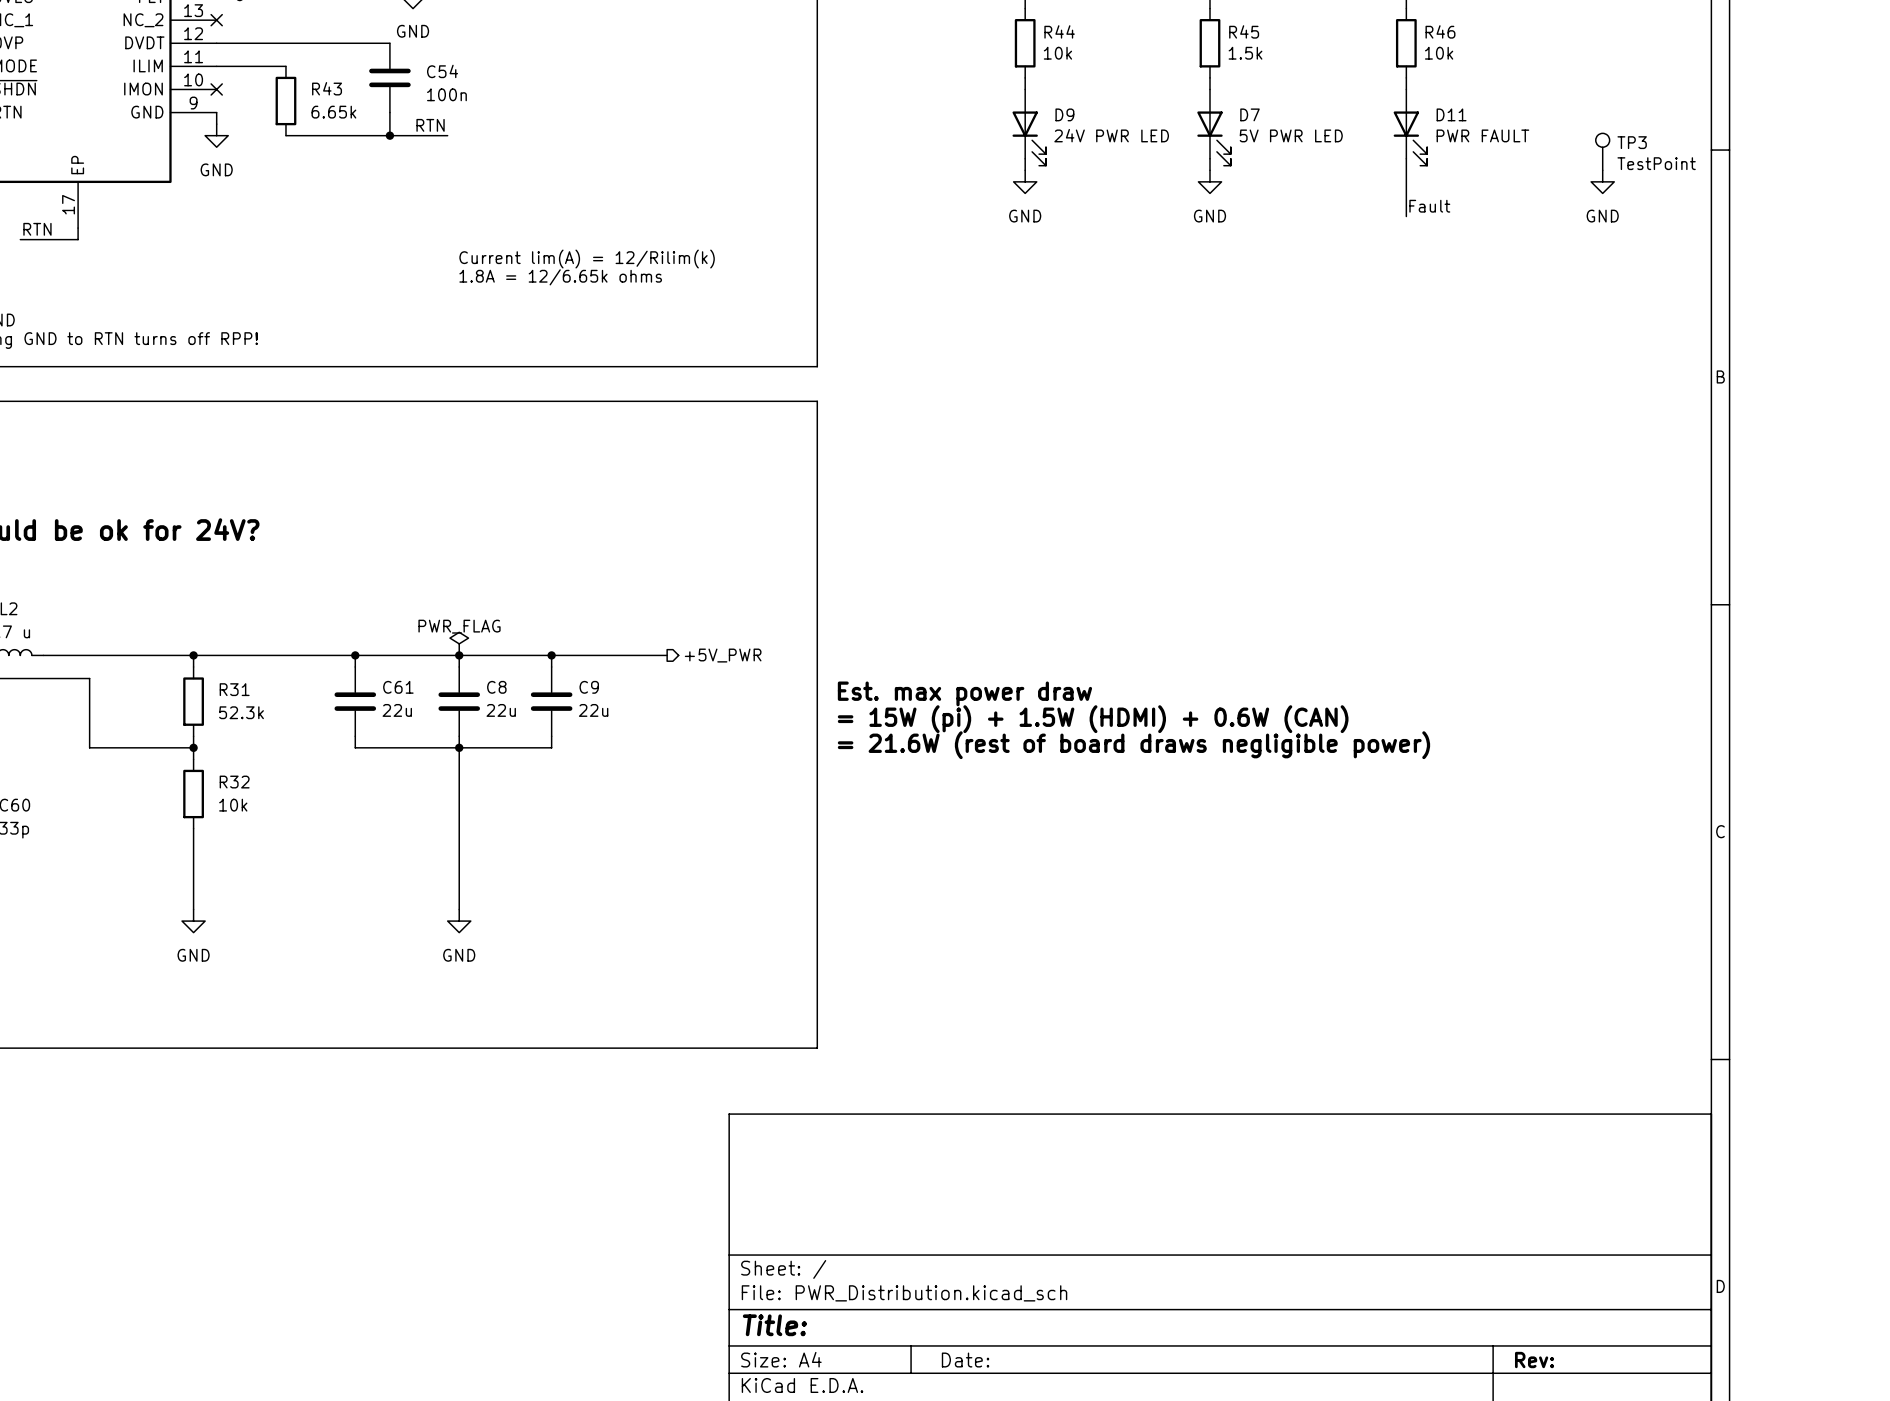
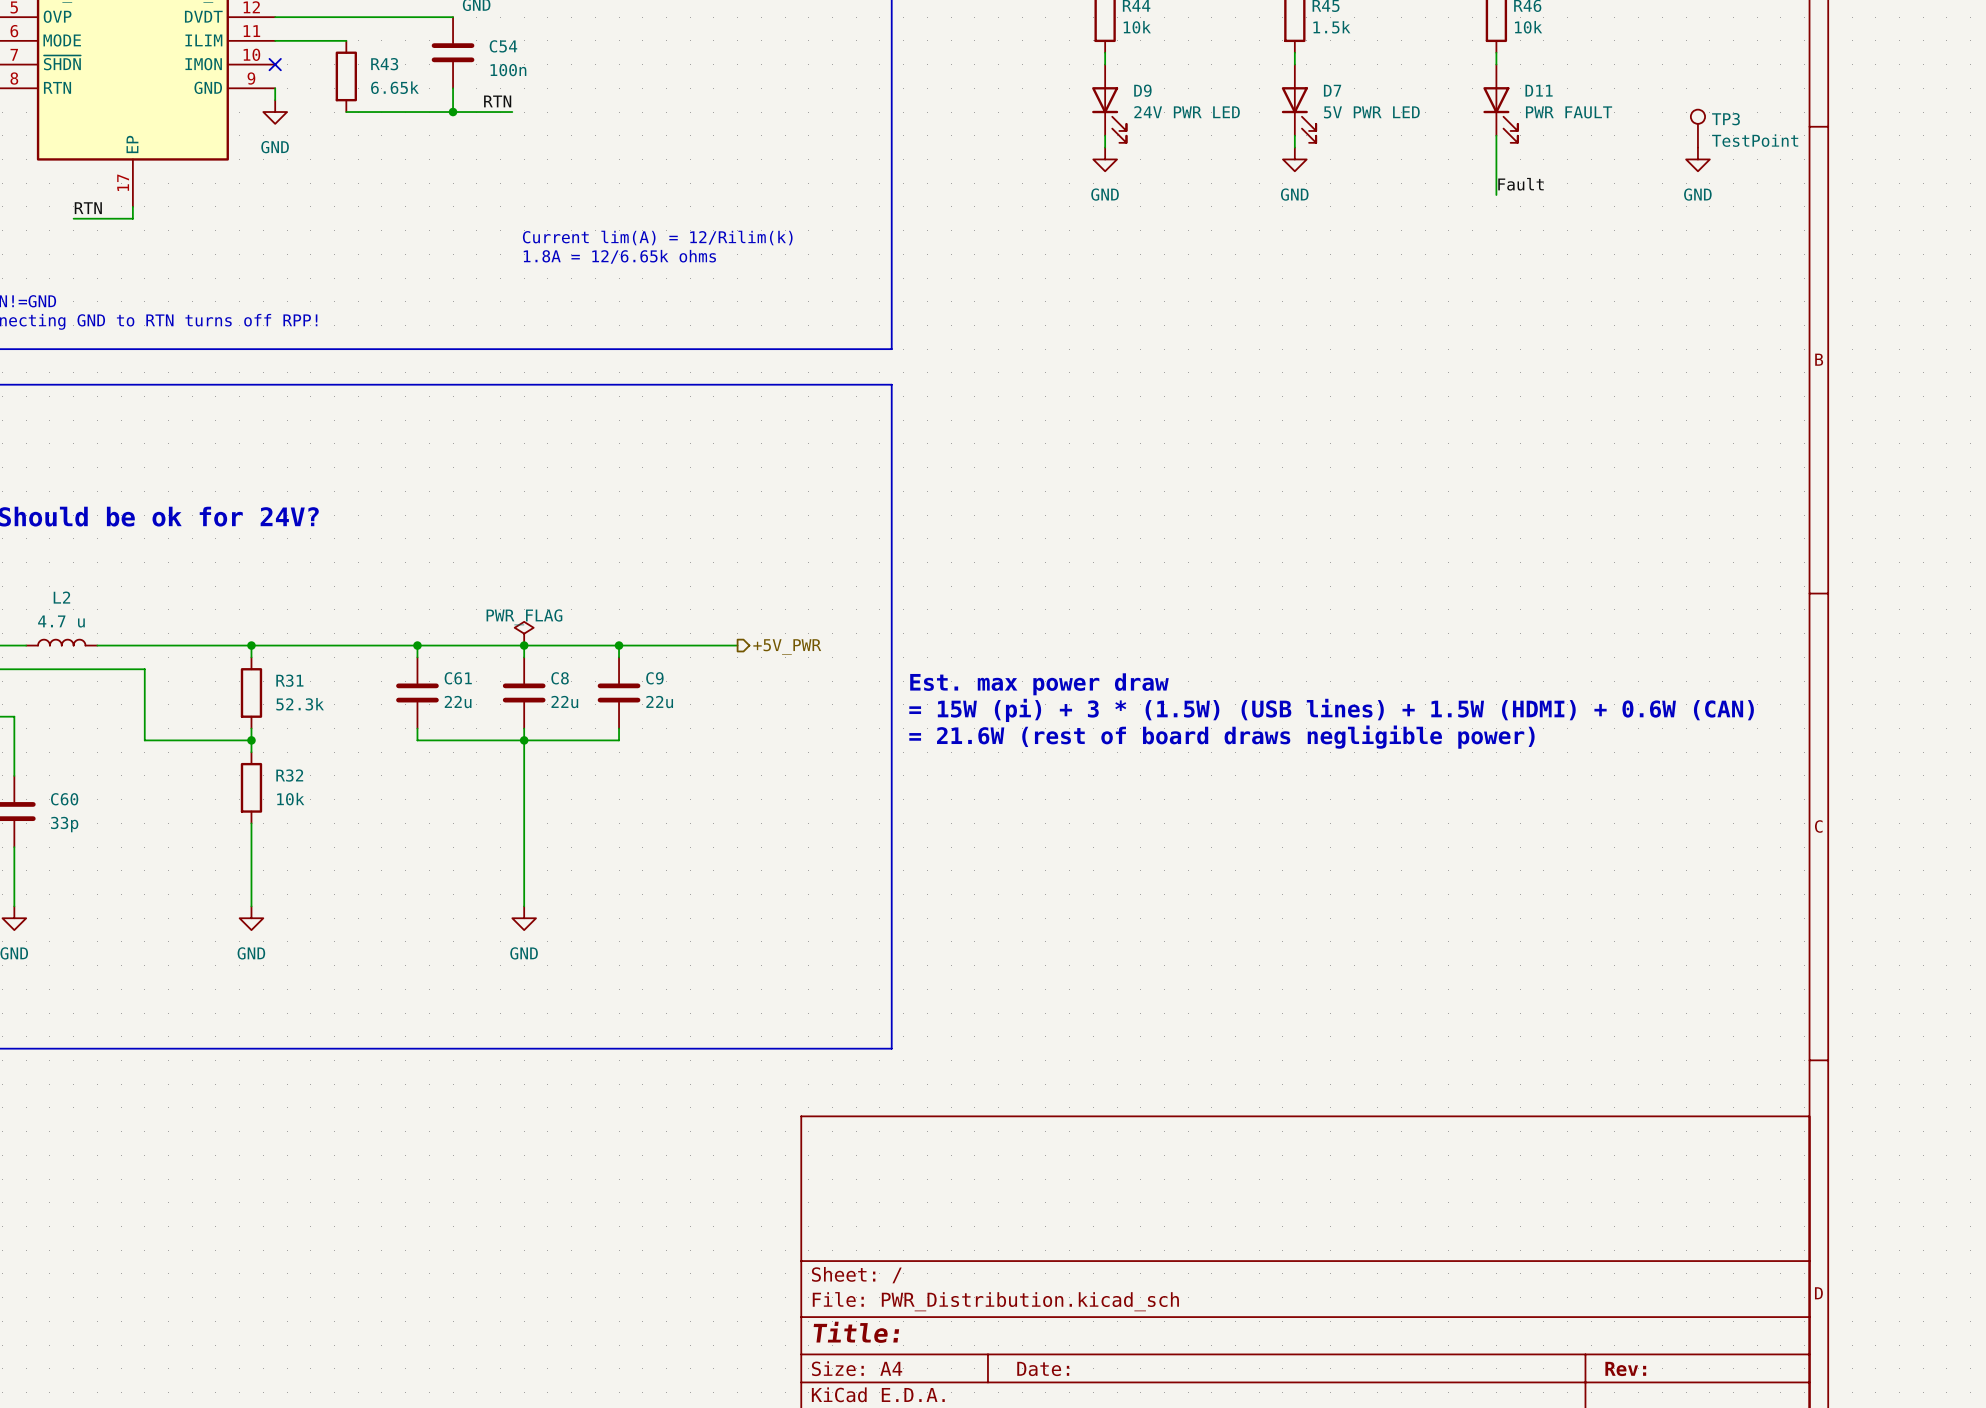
text: = 15W (pi) + 1.5W (HDMI) + 0.6W (CAN) (1093, 719) -> = 15W (pi) + 3 * (1.5W) (USB lines) + 1.5W (HDMI) + 0.6W (CAN) (1331, 710)

